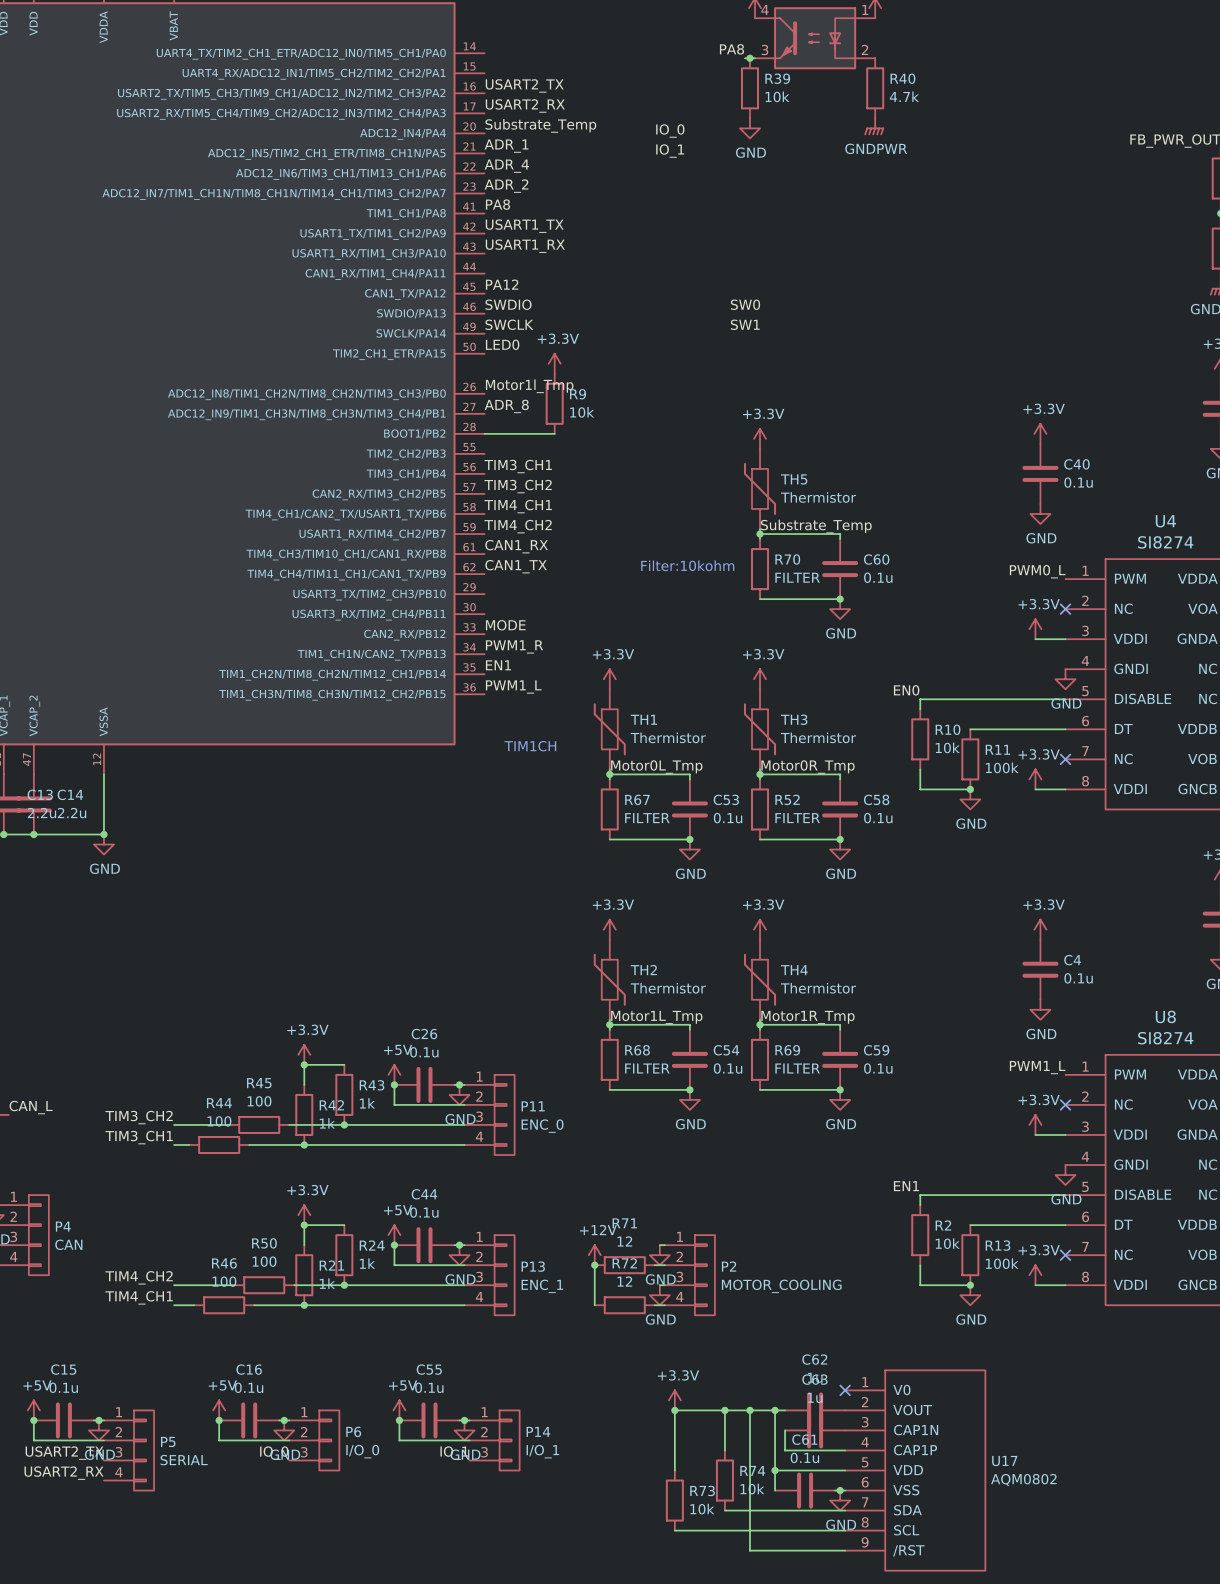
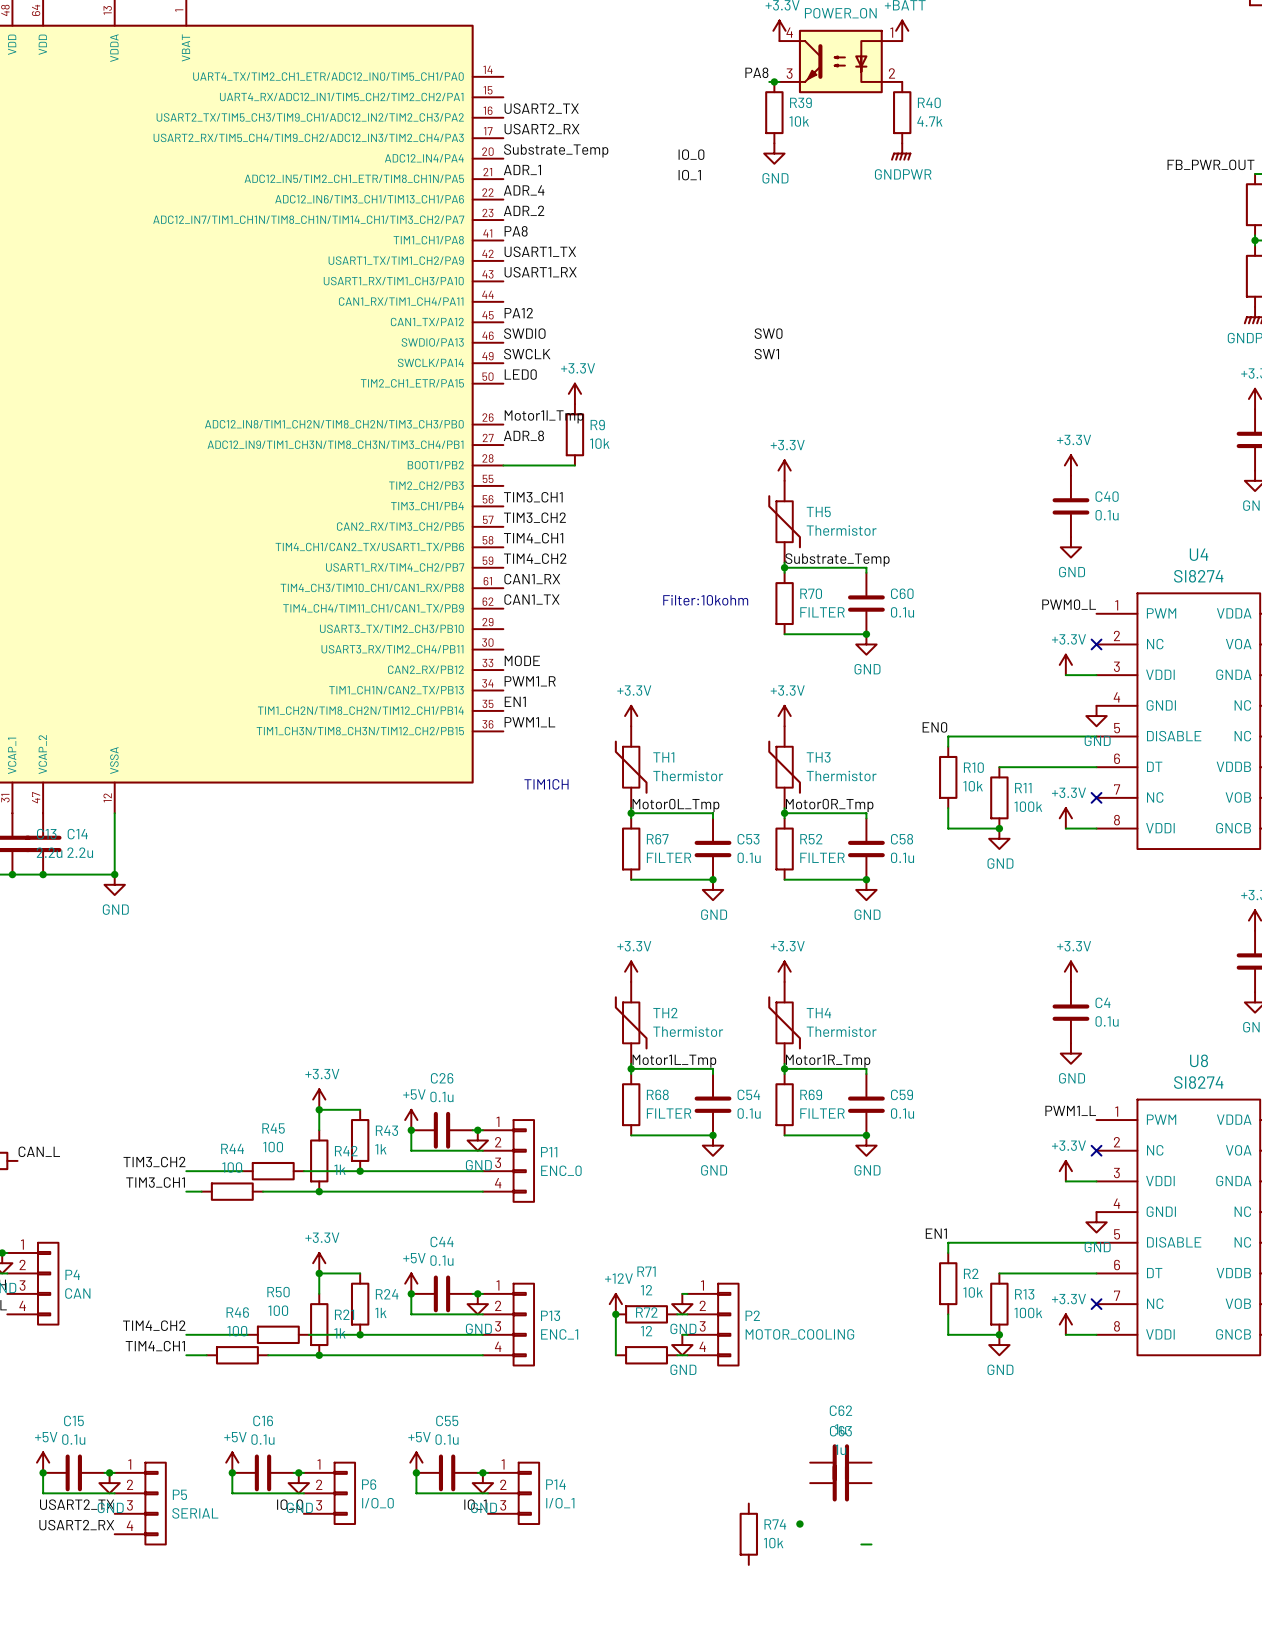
no-connect mark: (845, 1390) -> none
power symbol: +3.3V (674, 1400) -> none
junction: (674, 1410) -> none
wire: (724, 1410) (724, 1450) -> none
junction: (724, 1410) -> none
wire: (750, 1410) (750, 1550) (845, 1550) -> none
junction: (750, 1410) -> none
wire: (775, 1410) (775, 1490) -> none
junction: (775, 1410) -> none
wire: (785, 1410) (674, 1410) (674, 1470) -> none
wire: (785, 1430) (785, 1450) (845, 1450) -> none
wire: (775, 1470) (845, 1470) -> none
U17: AQM0802 (915, 1470) -> none
C61: 0.1u (805, 1490) -> none
junction: (840, 1490) -> none
R73: 10k (674, 1500) -> none
power symbol: GND (840, 1500) -> none
wire: (724, 1510) (845, 1510) -> none
wire: (674, 1530) (845, 1530) -> none

